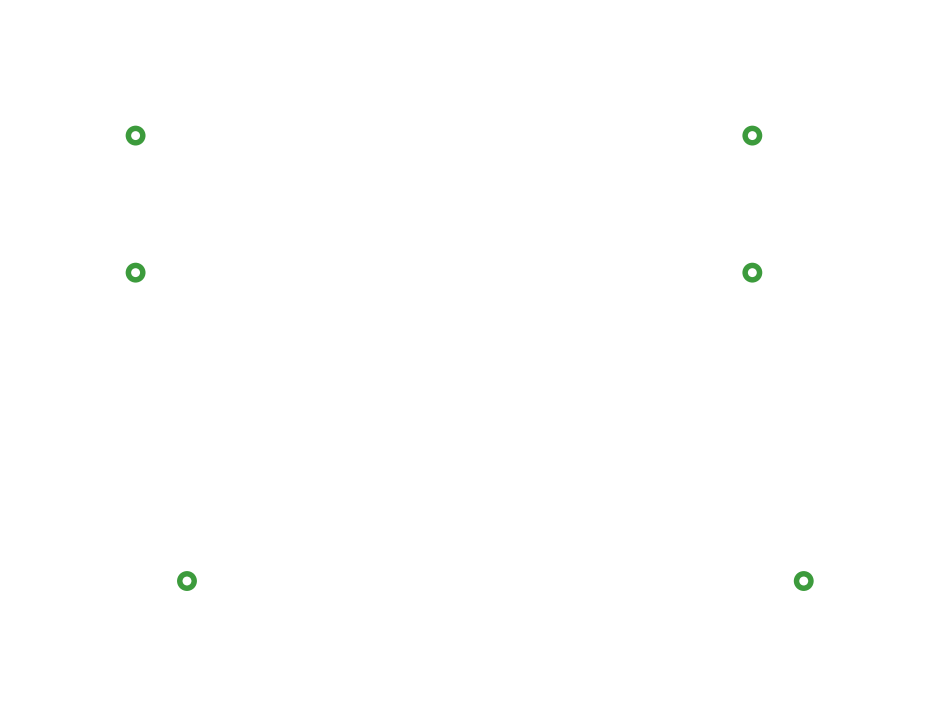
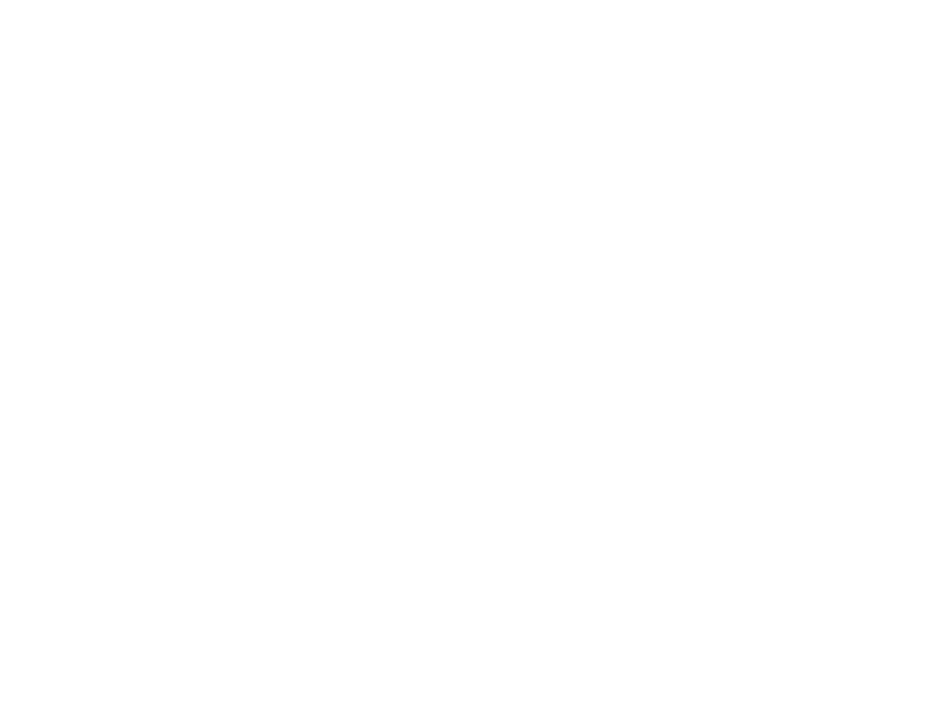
via: (135, 135) -> none
via: (752, 135) -> none
via: (135, 272) -> none
via: (752, 272) -> none
via: (186, 581) -> none
via: (803, 581) -> none

